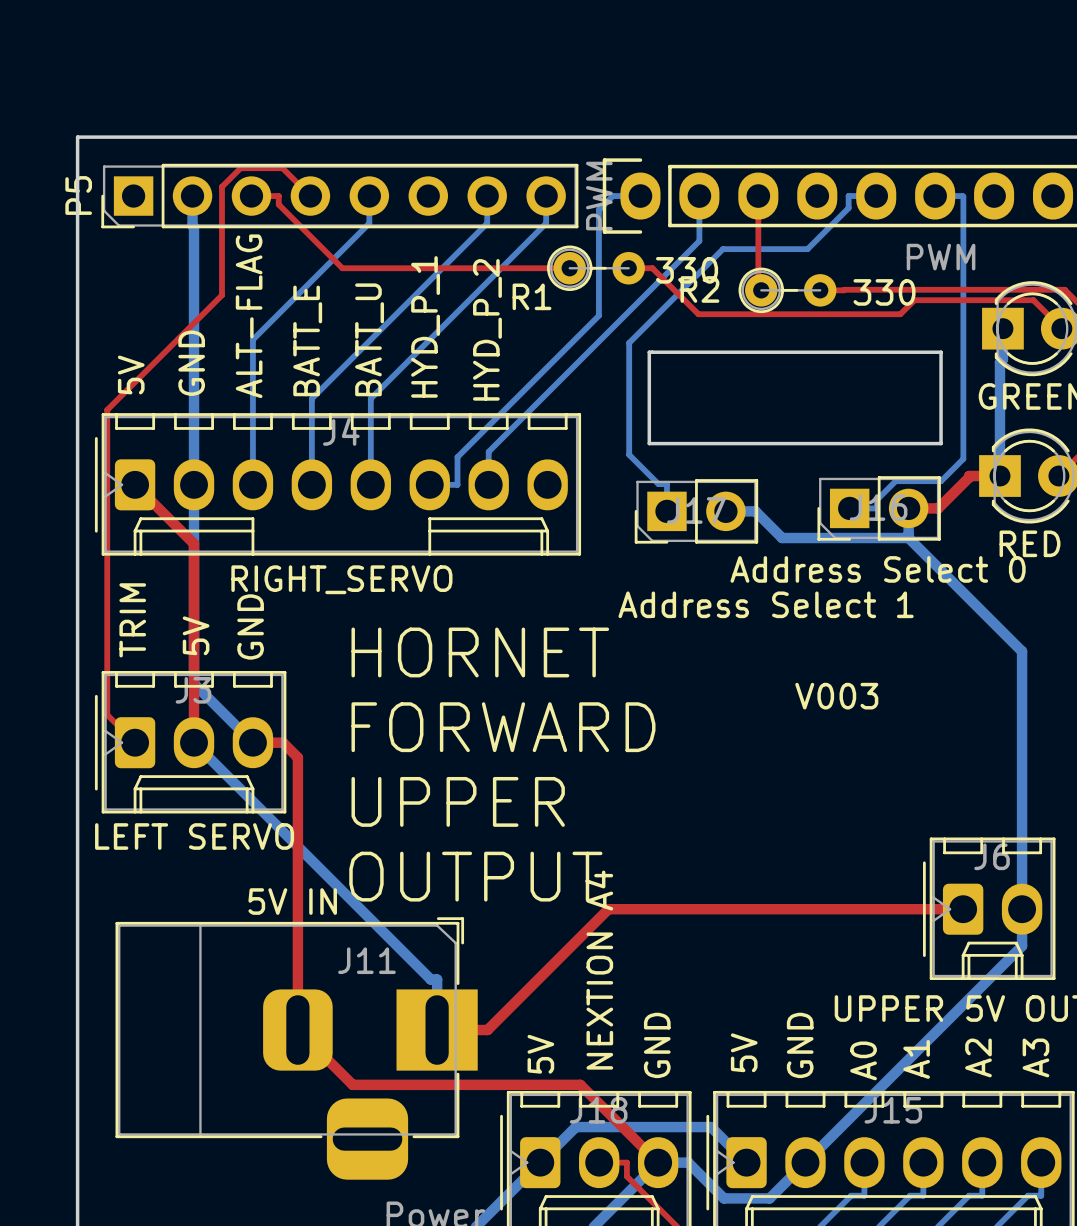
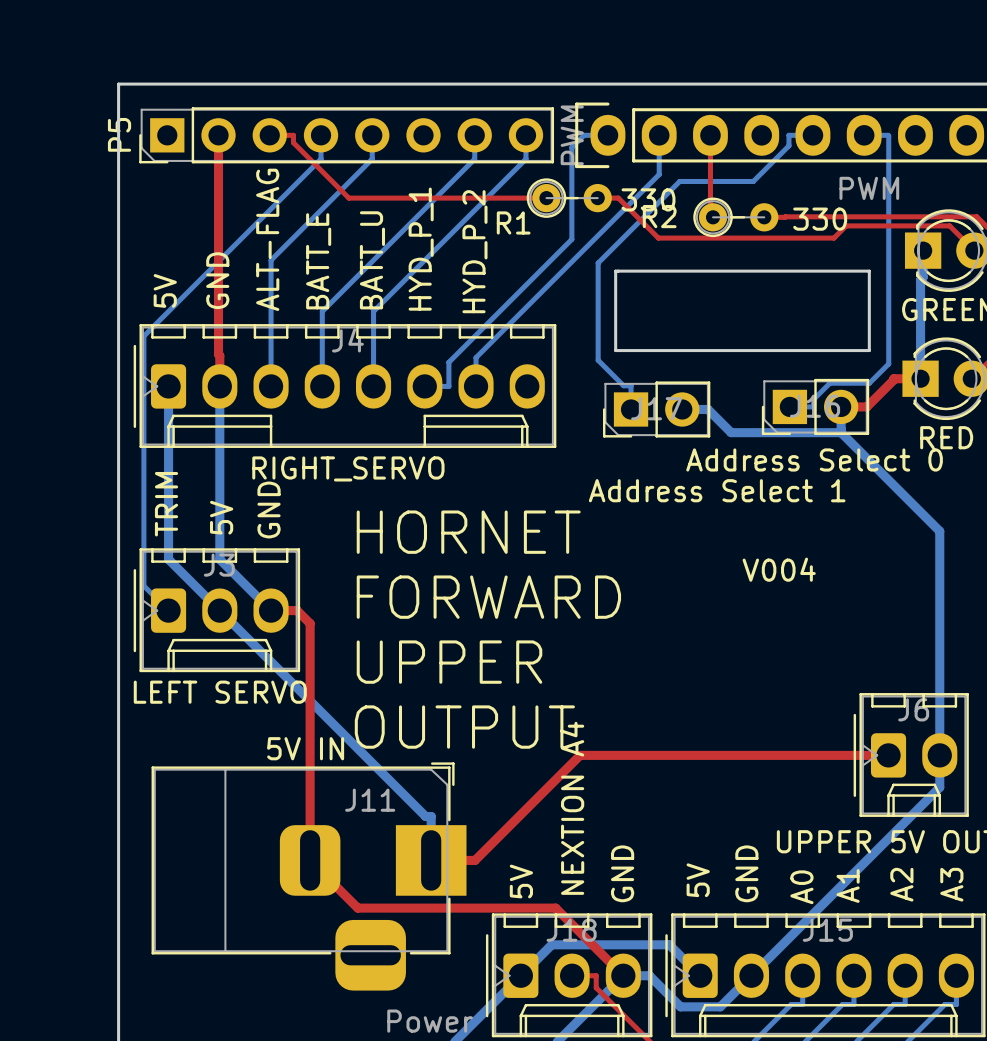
bottom track: (192, 196) (194, 484) -> none
top track: none -> (218, 135) (219, 386)
bottom track: none -> (321, 135) (321, 159) (143, 336) (143, 585) (168, 610)
top track: (310, 196) (282, 168) (240, 168) (222, 186) (222, 295) (107, 409) (107, 714) (135, 742) -> none
bottom track: none -> (168, 386) (168, 559) (219, 610)
top track: (135, 484) (194, 543) (194, 742) -> none
text: V003 (836, 696) -> V004 (779, 569)

